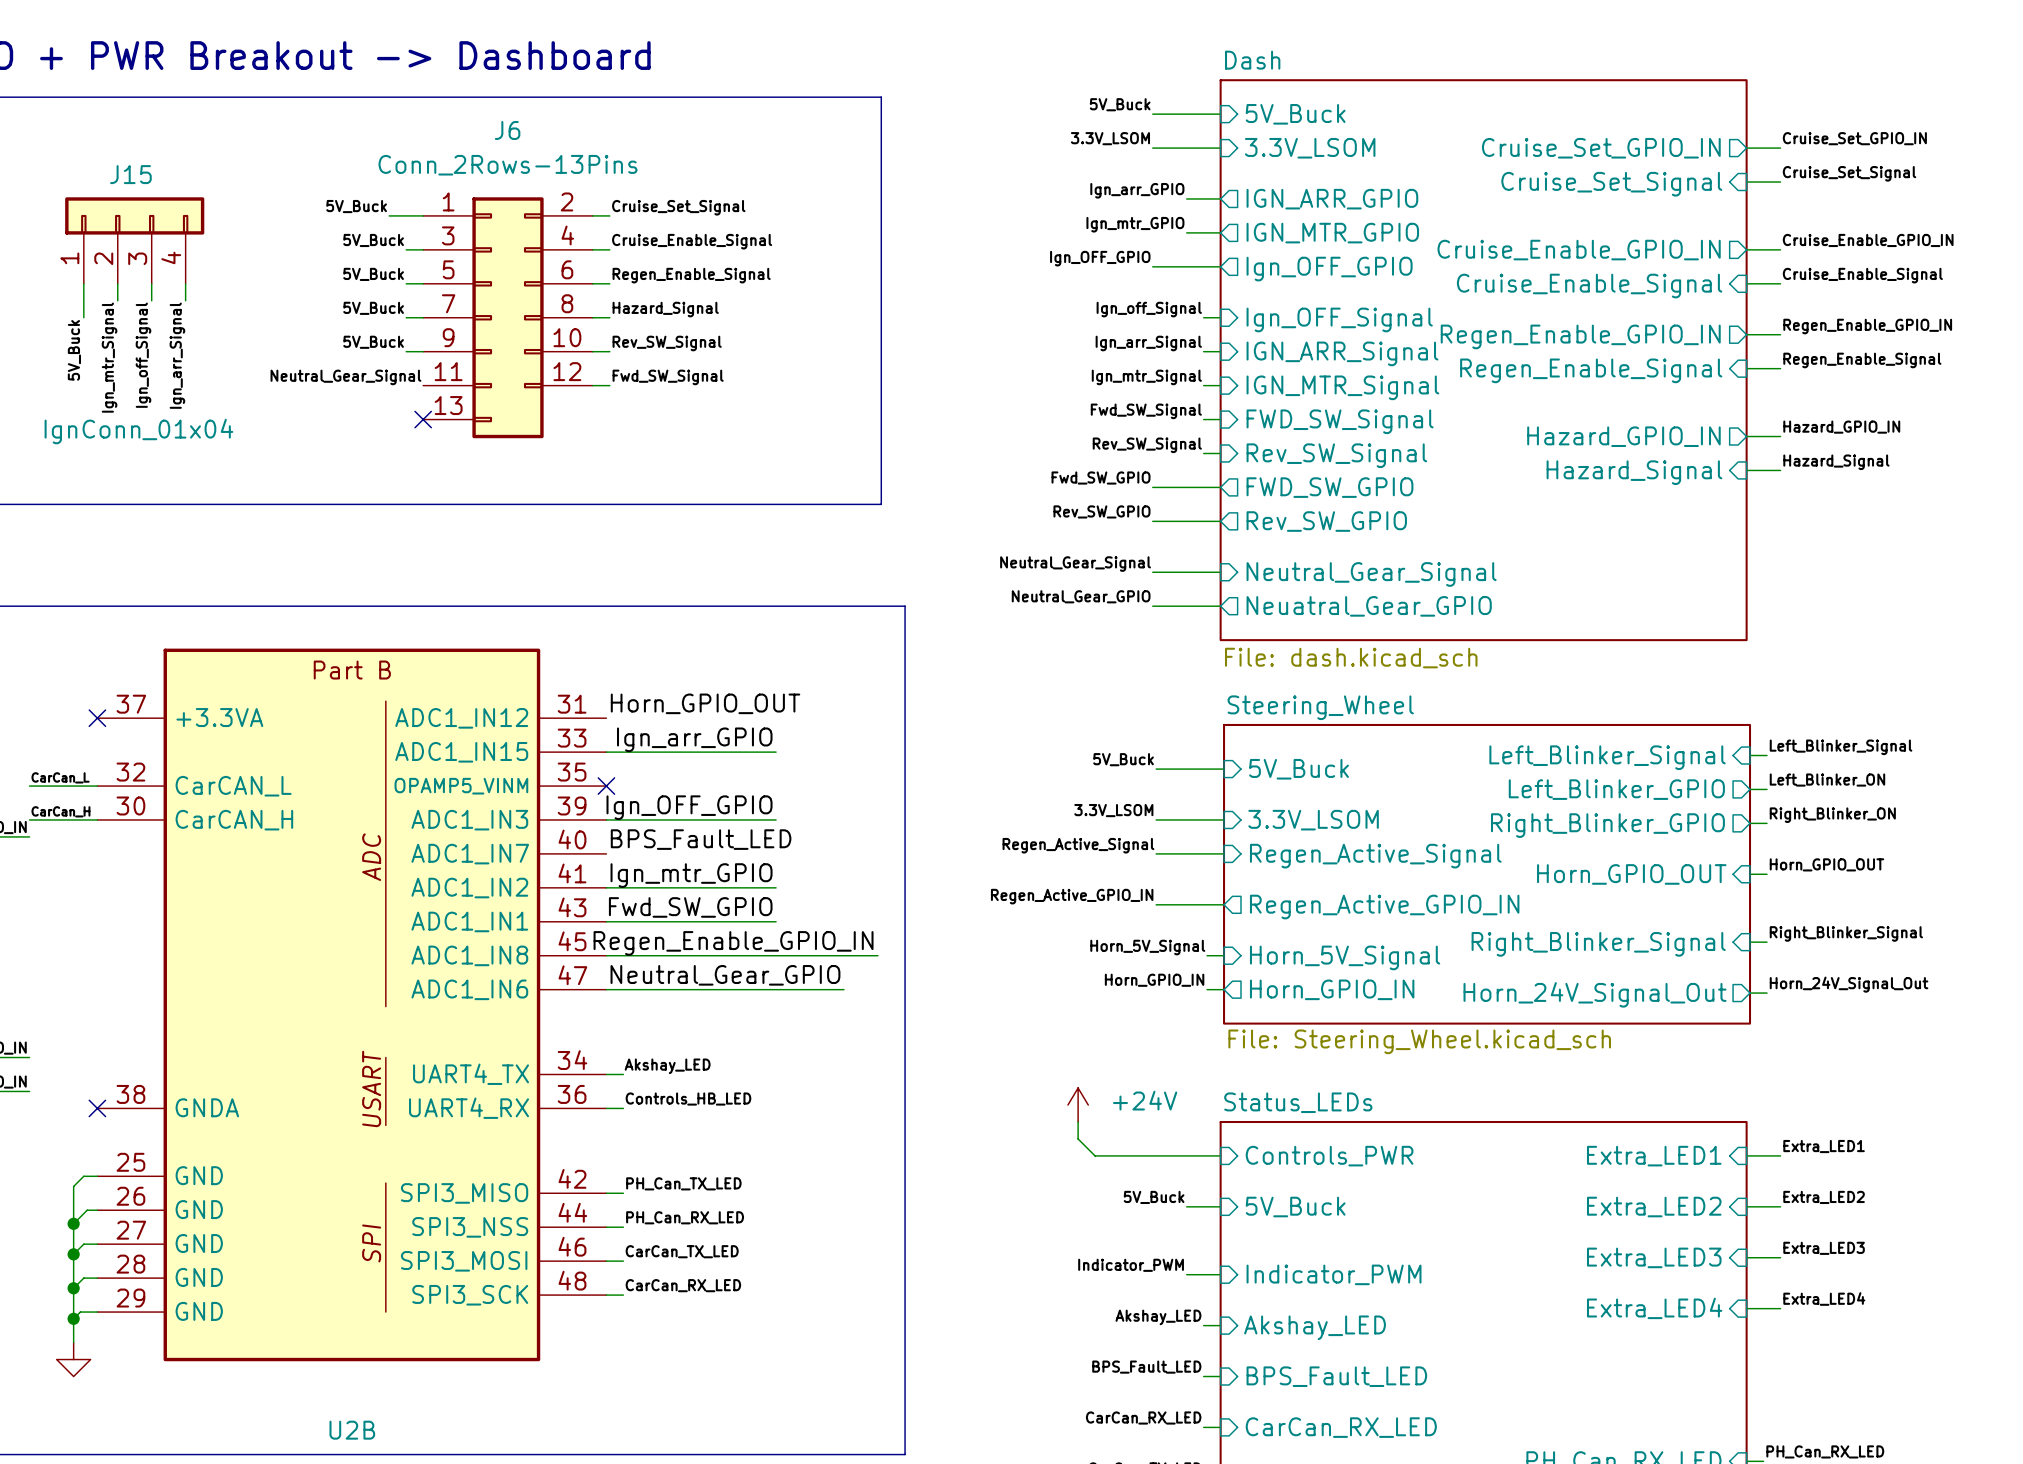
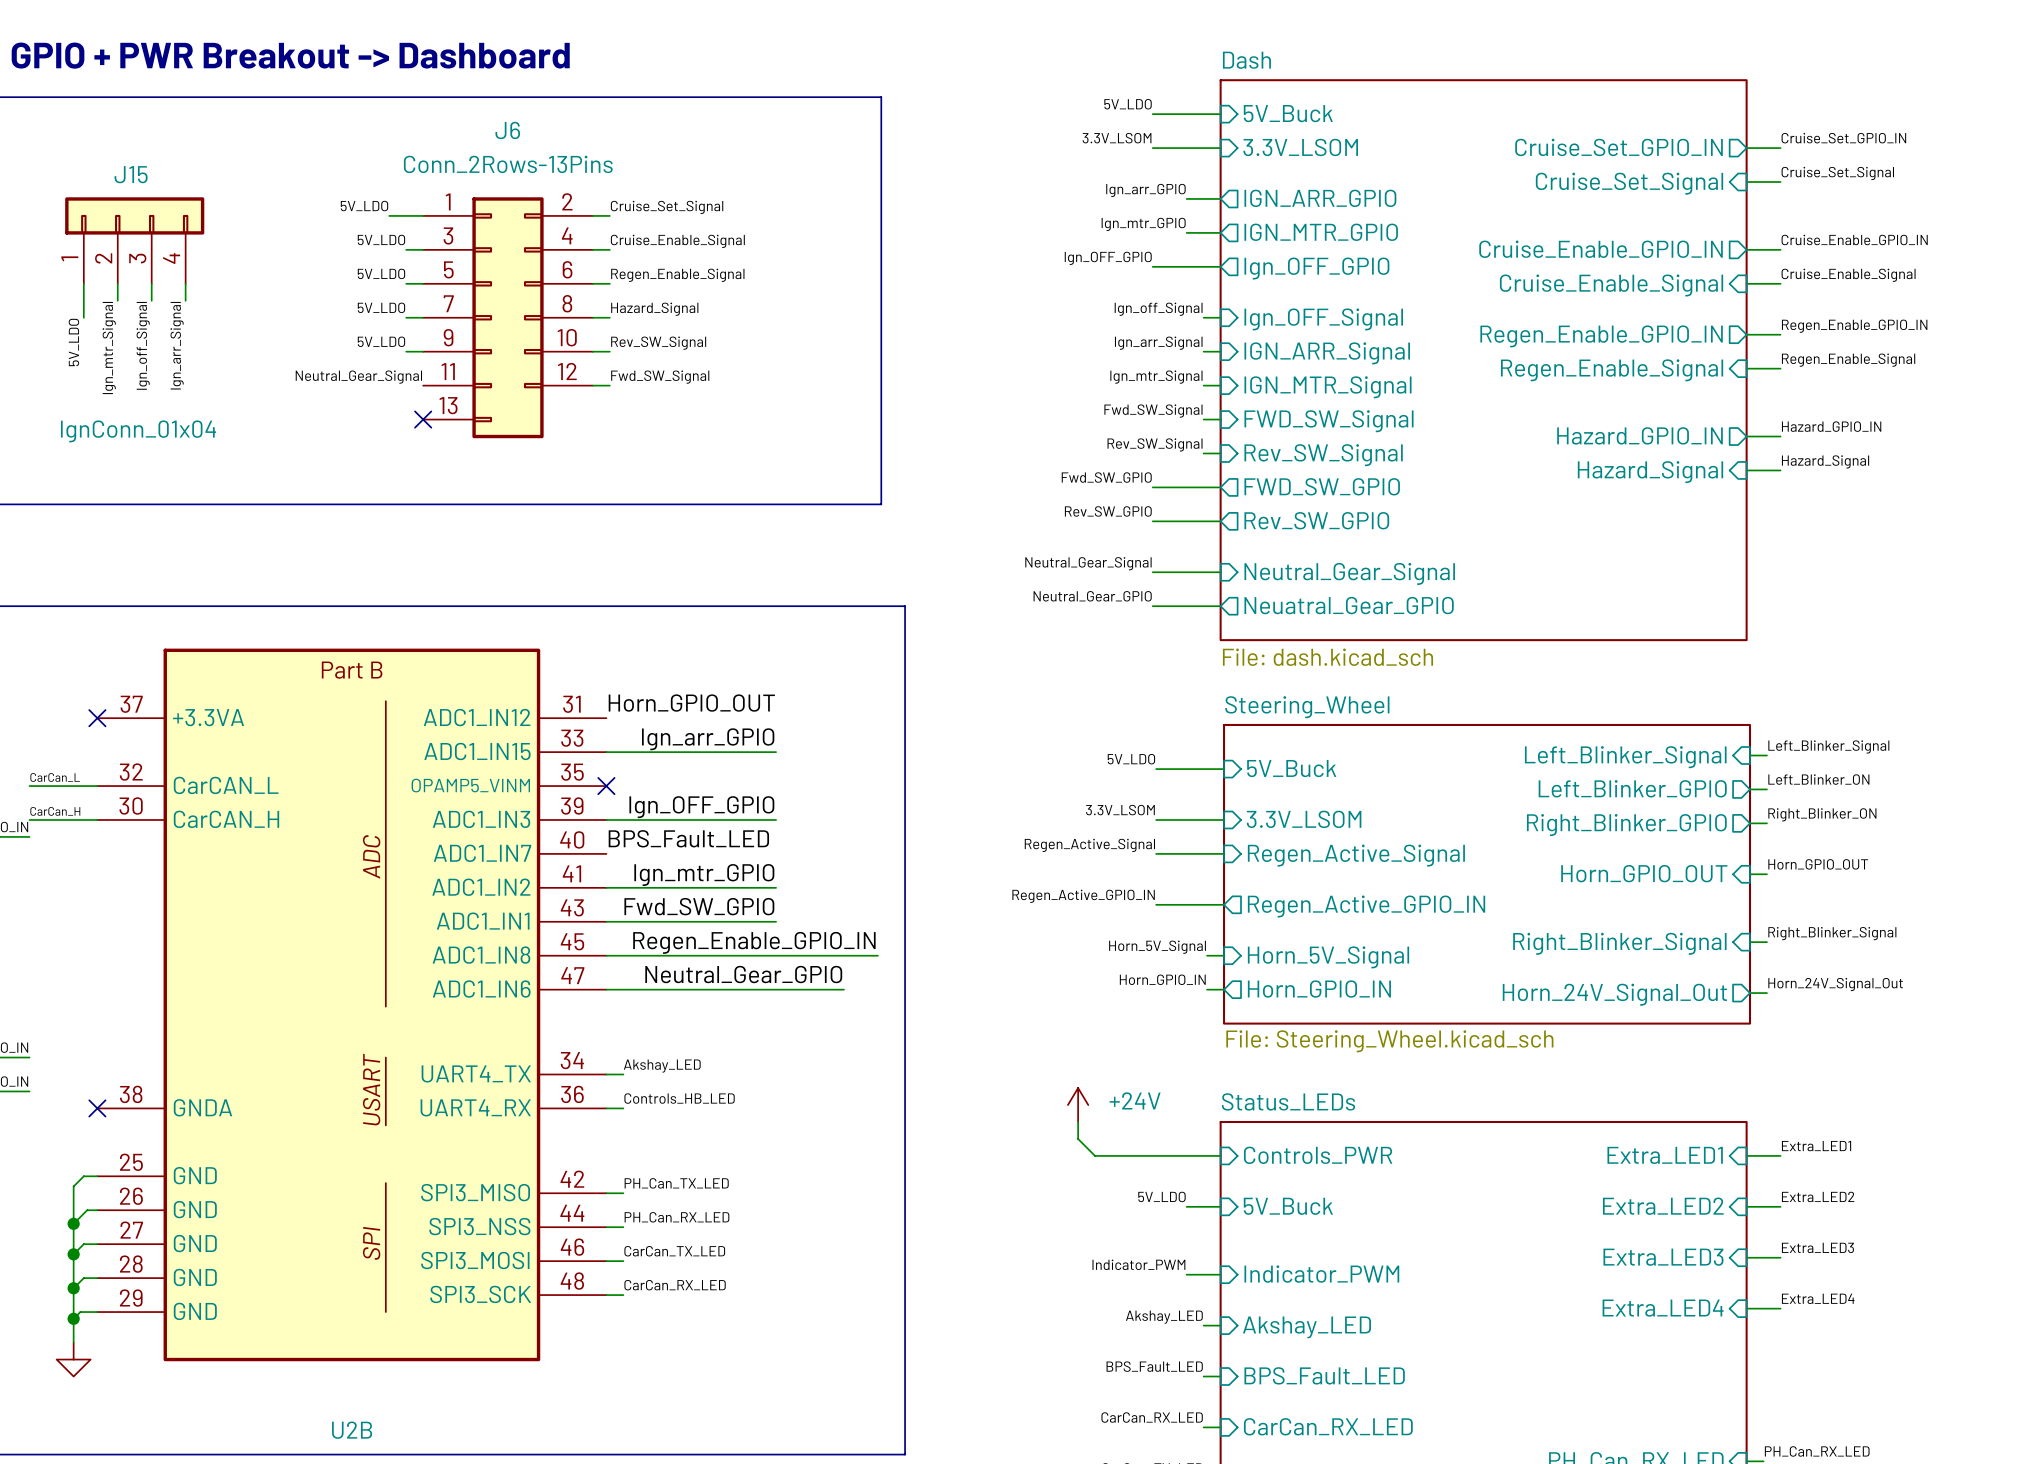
label: 5V_Buck (1120, 104) -> 5V_LDO (1128, 104)
label: 5V_Buck (356, 206) -> 5V_LDO (364, 206)
label: 5V_Buck (373, 240) -> 5V_LDO (381, 239)
label: 5V_Buck (373, 274) -> 5V_LDO (381, 273)
label: 5V_Buck (373, 308) -> 5V_LDO (381, 307)
label: 5V_Buck (373, 342) -> 5V_LDO (381, 341)
label: 5V_Buck (74, 350) -> 5V_LDO (73, 342)
label: 5V_Buck (1123, 759) -> 5V_LDO (1131, 759)
label: 5V_Buck (1154, 1197) -> 5V_LDO (1161, 1196)

